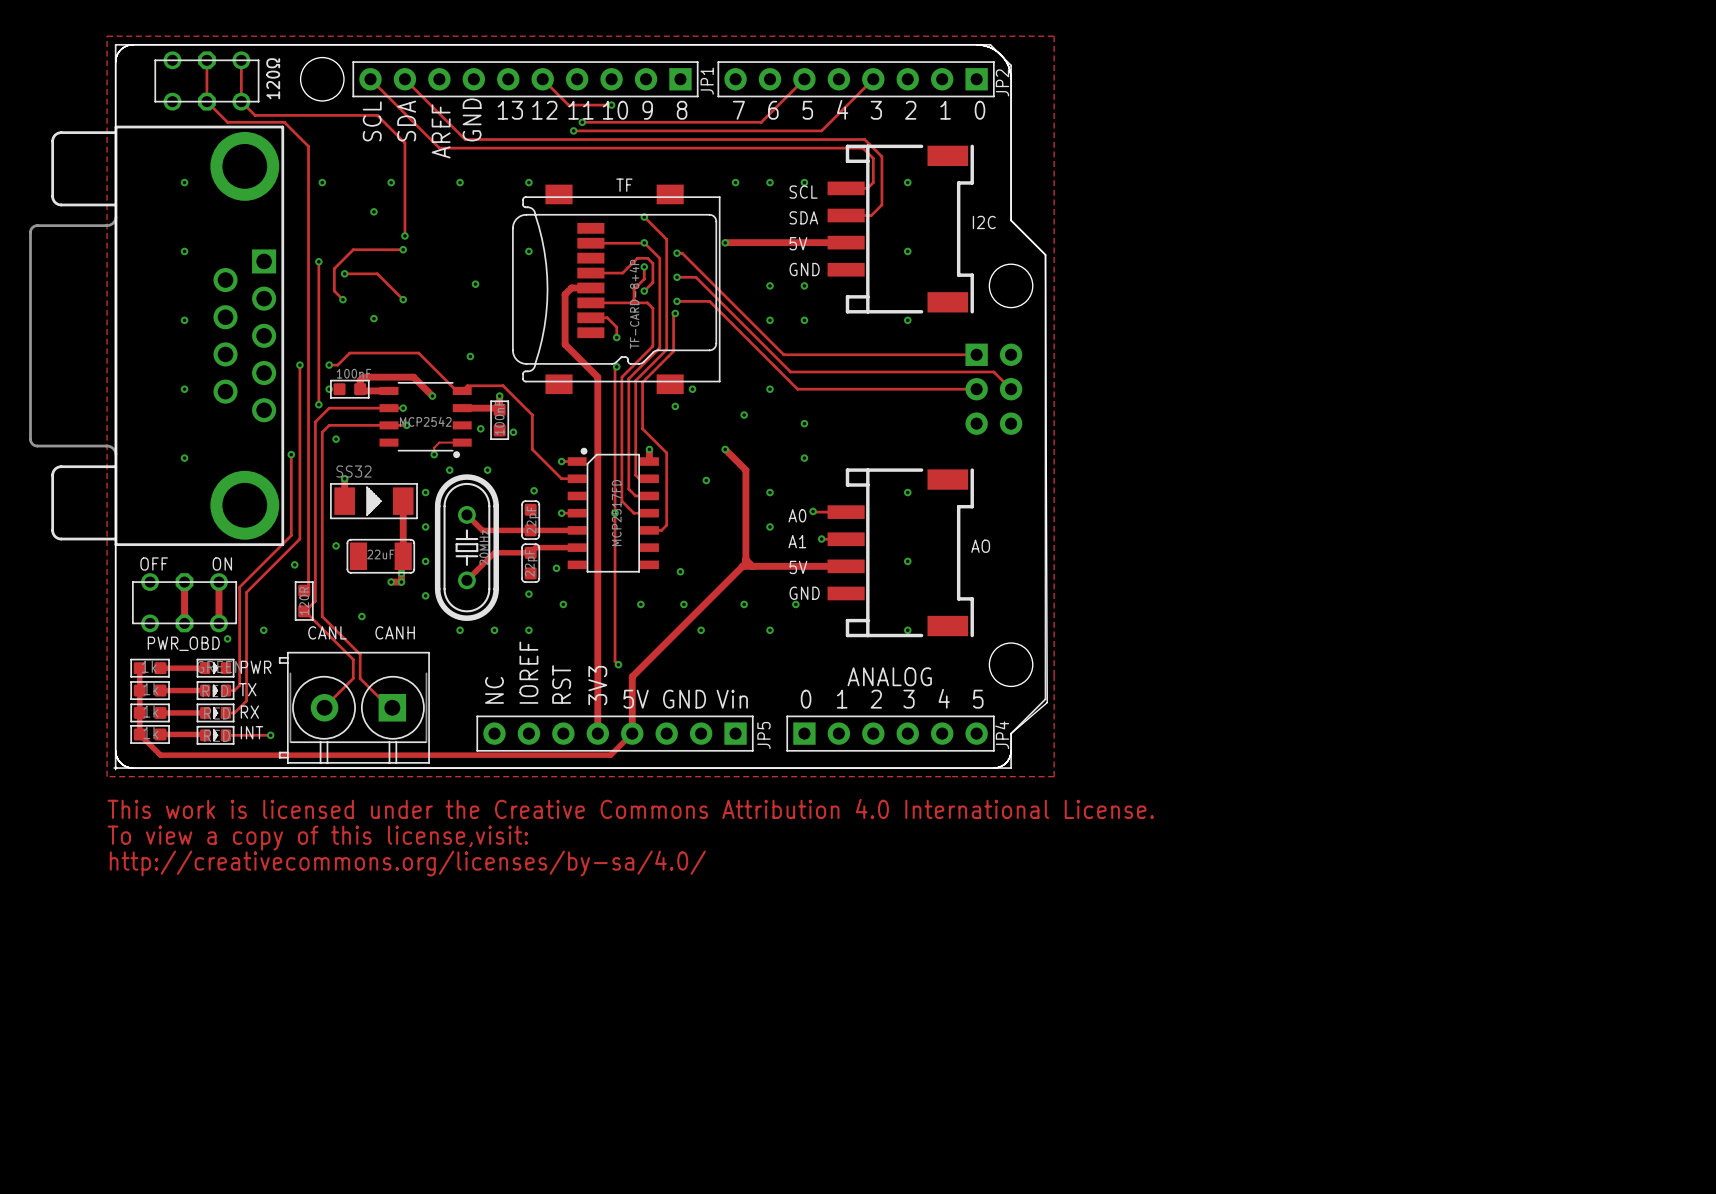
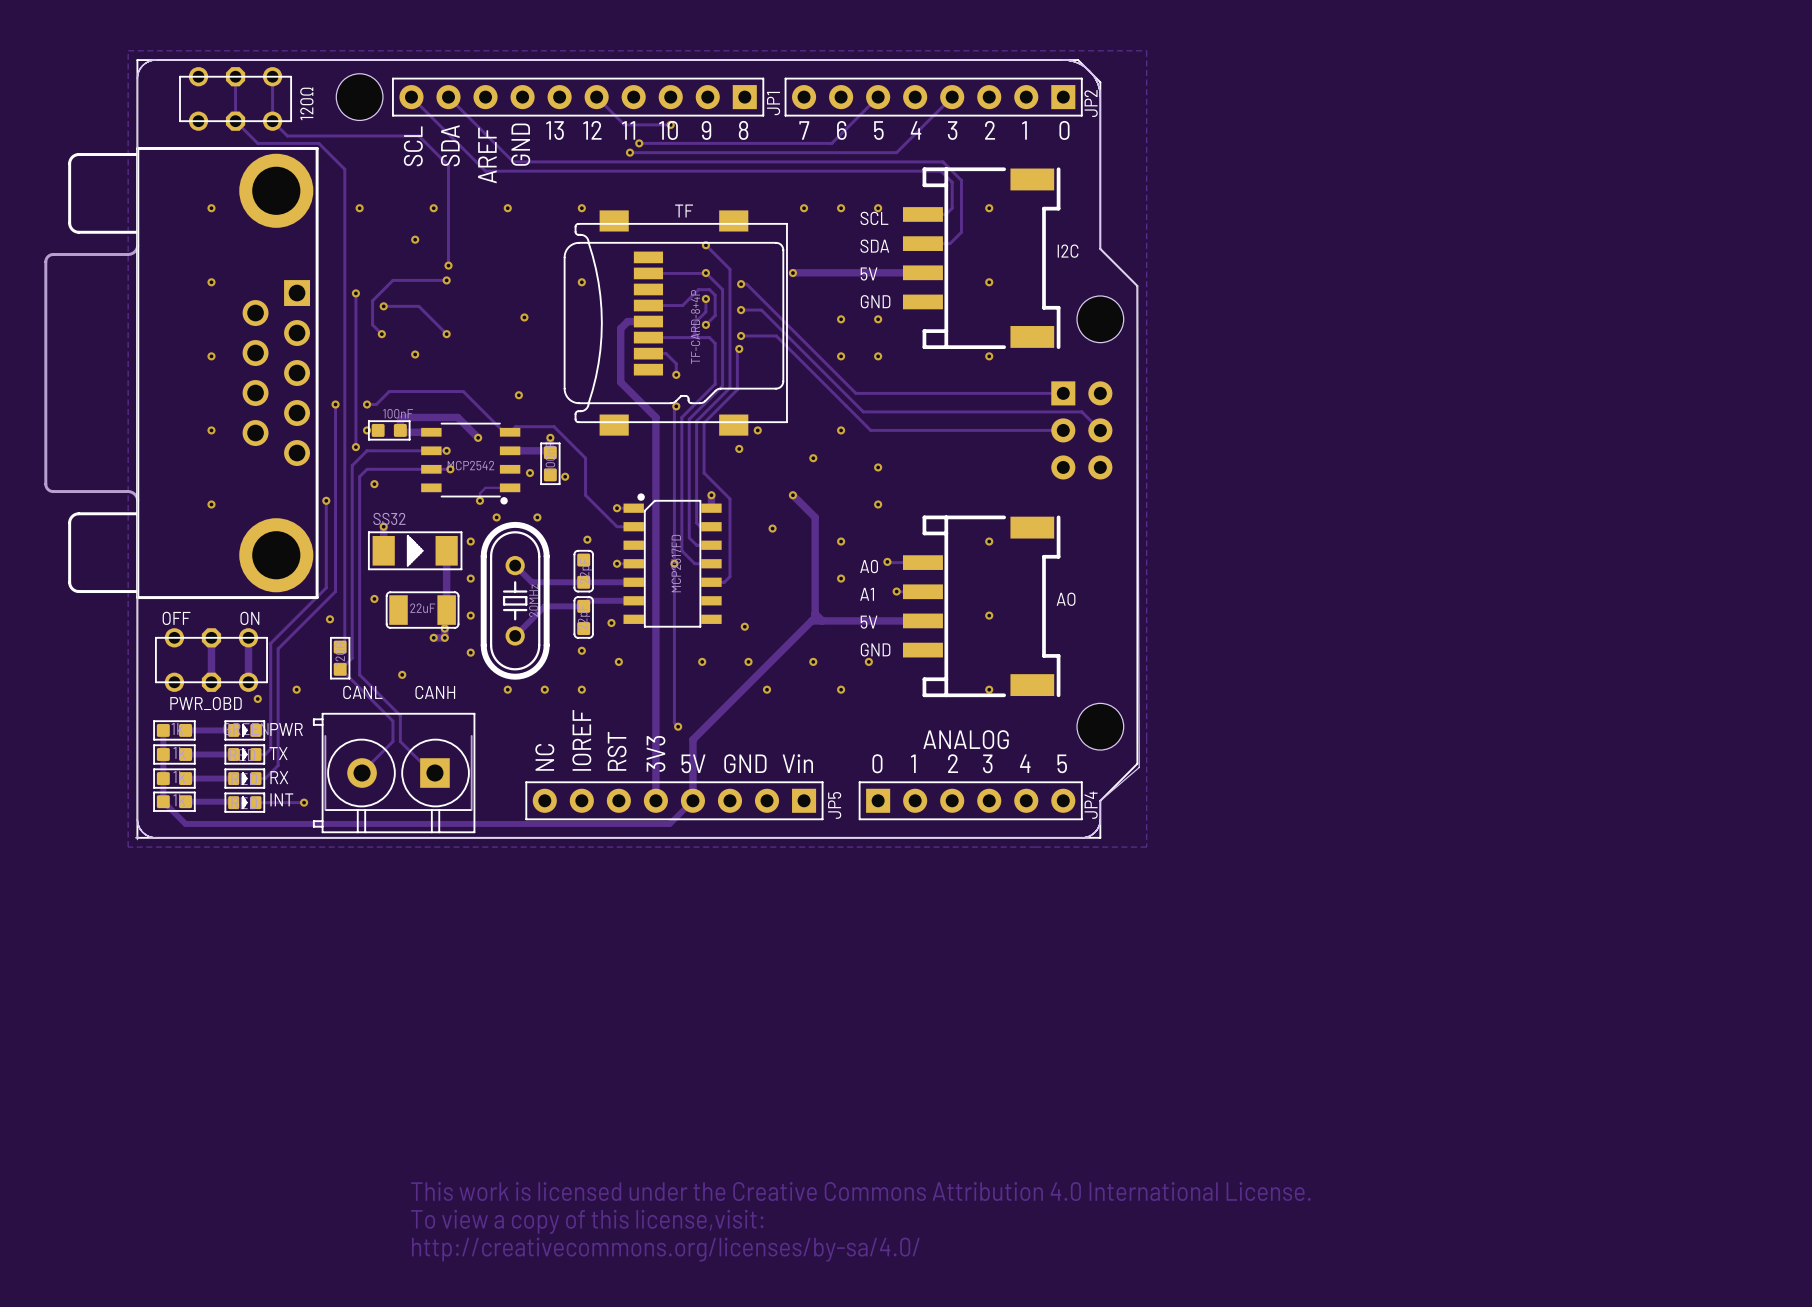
drawing: [107, 798, 1154, 877] -> none
drawing: none -> [411, 1181, 1311, 1262]

